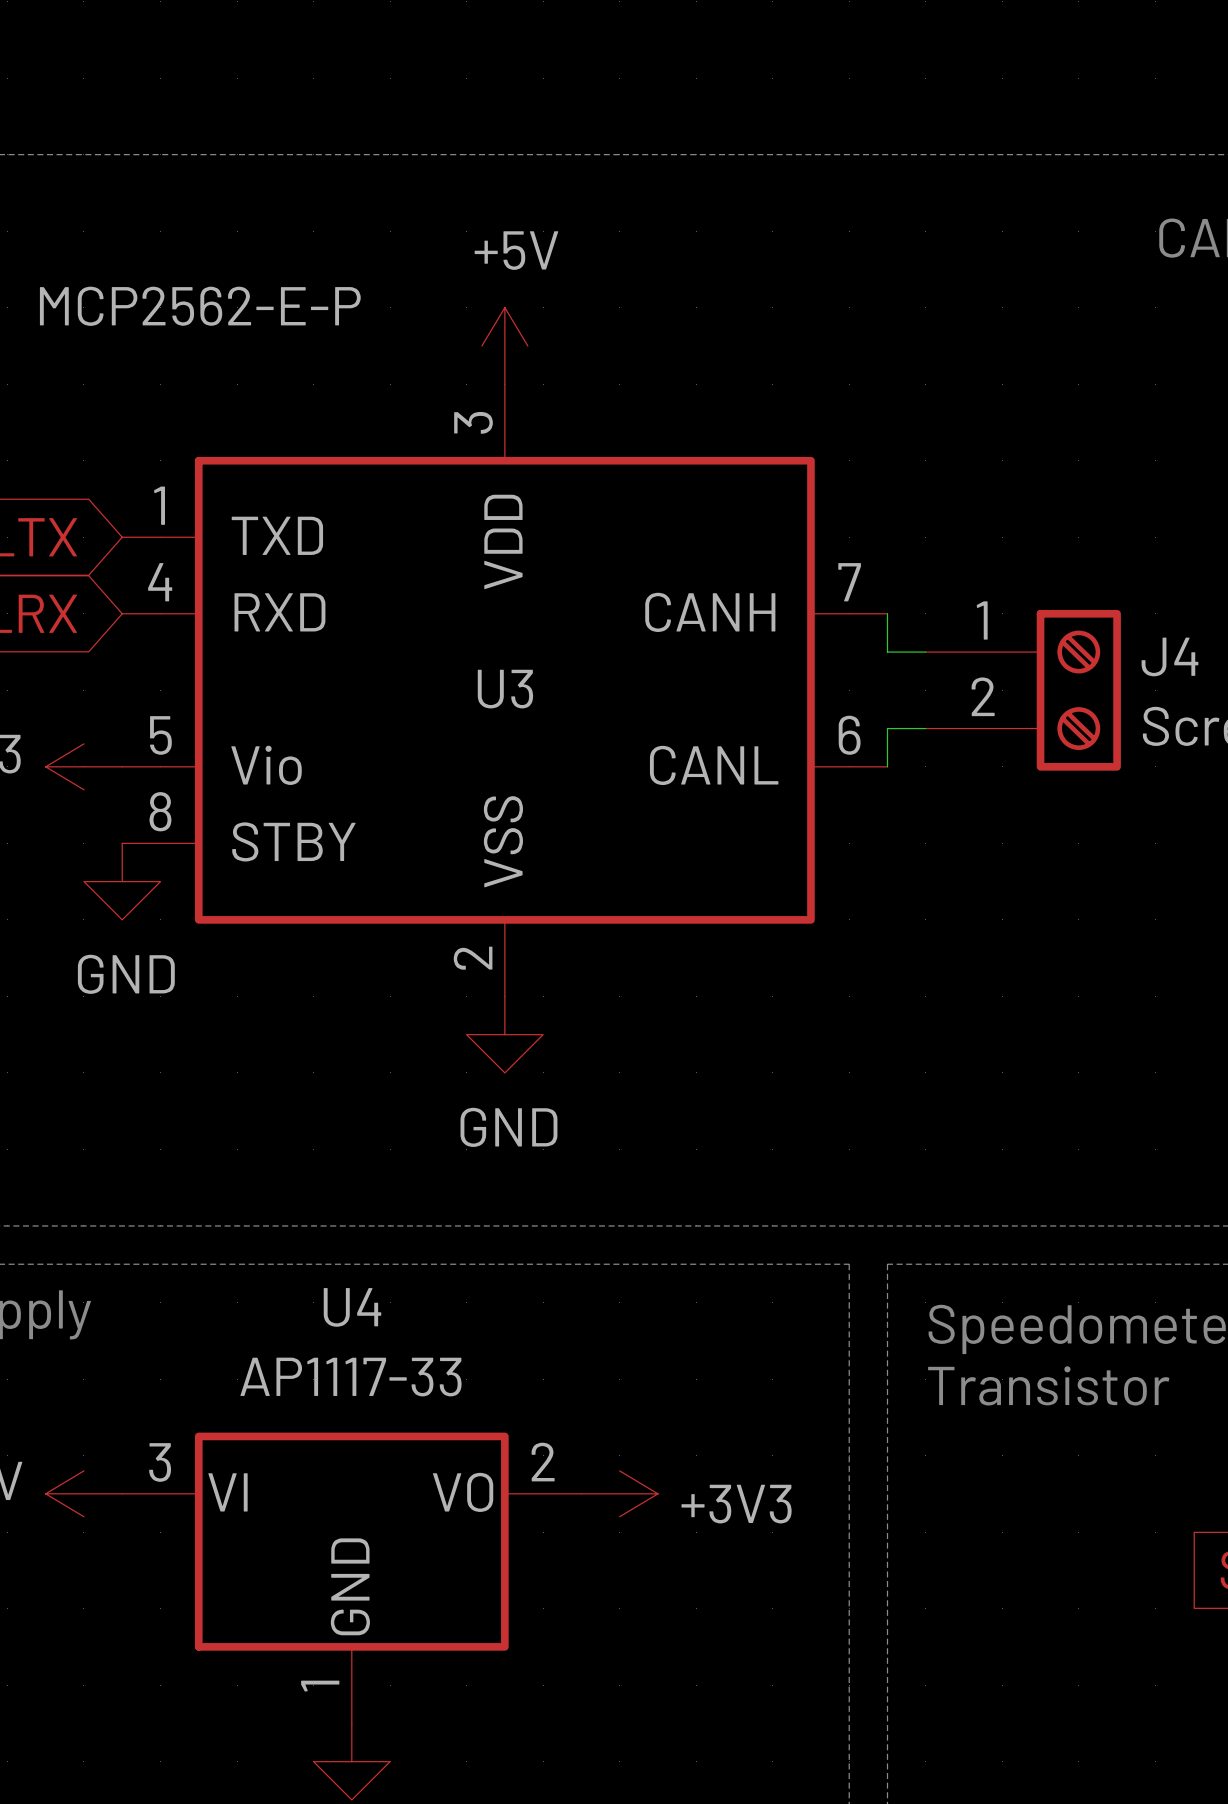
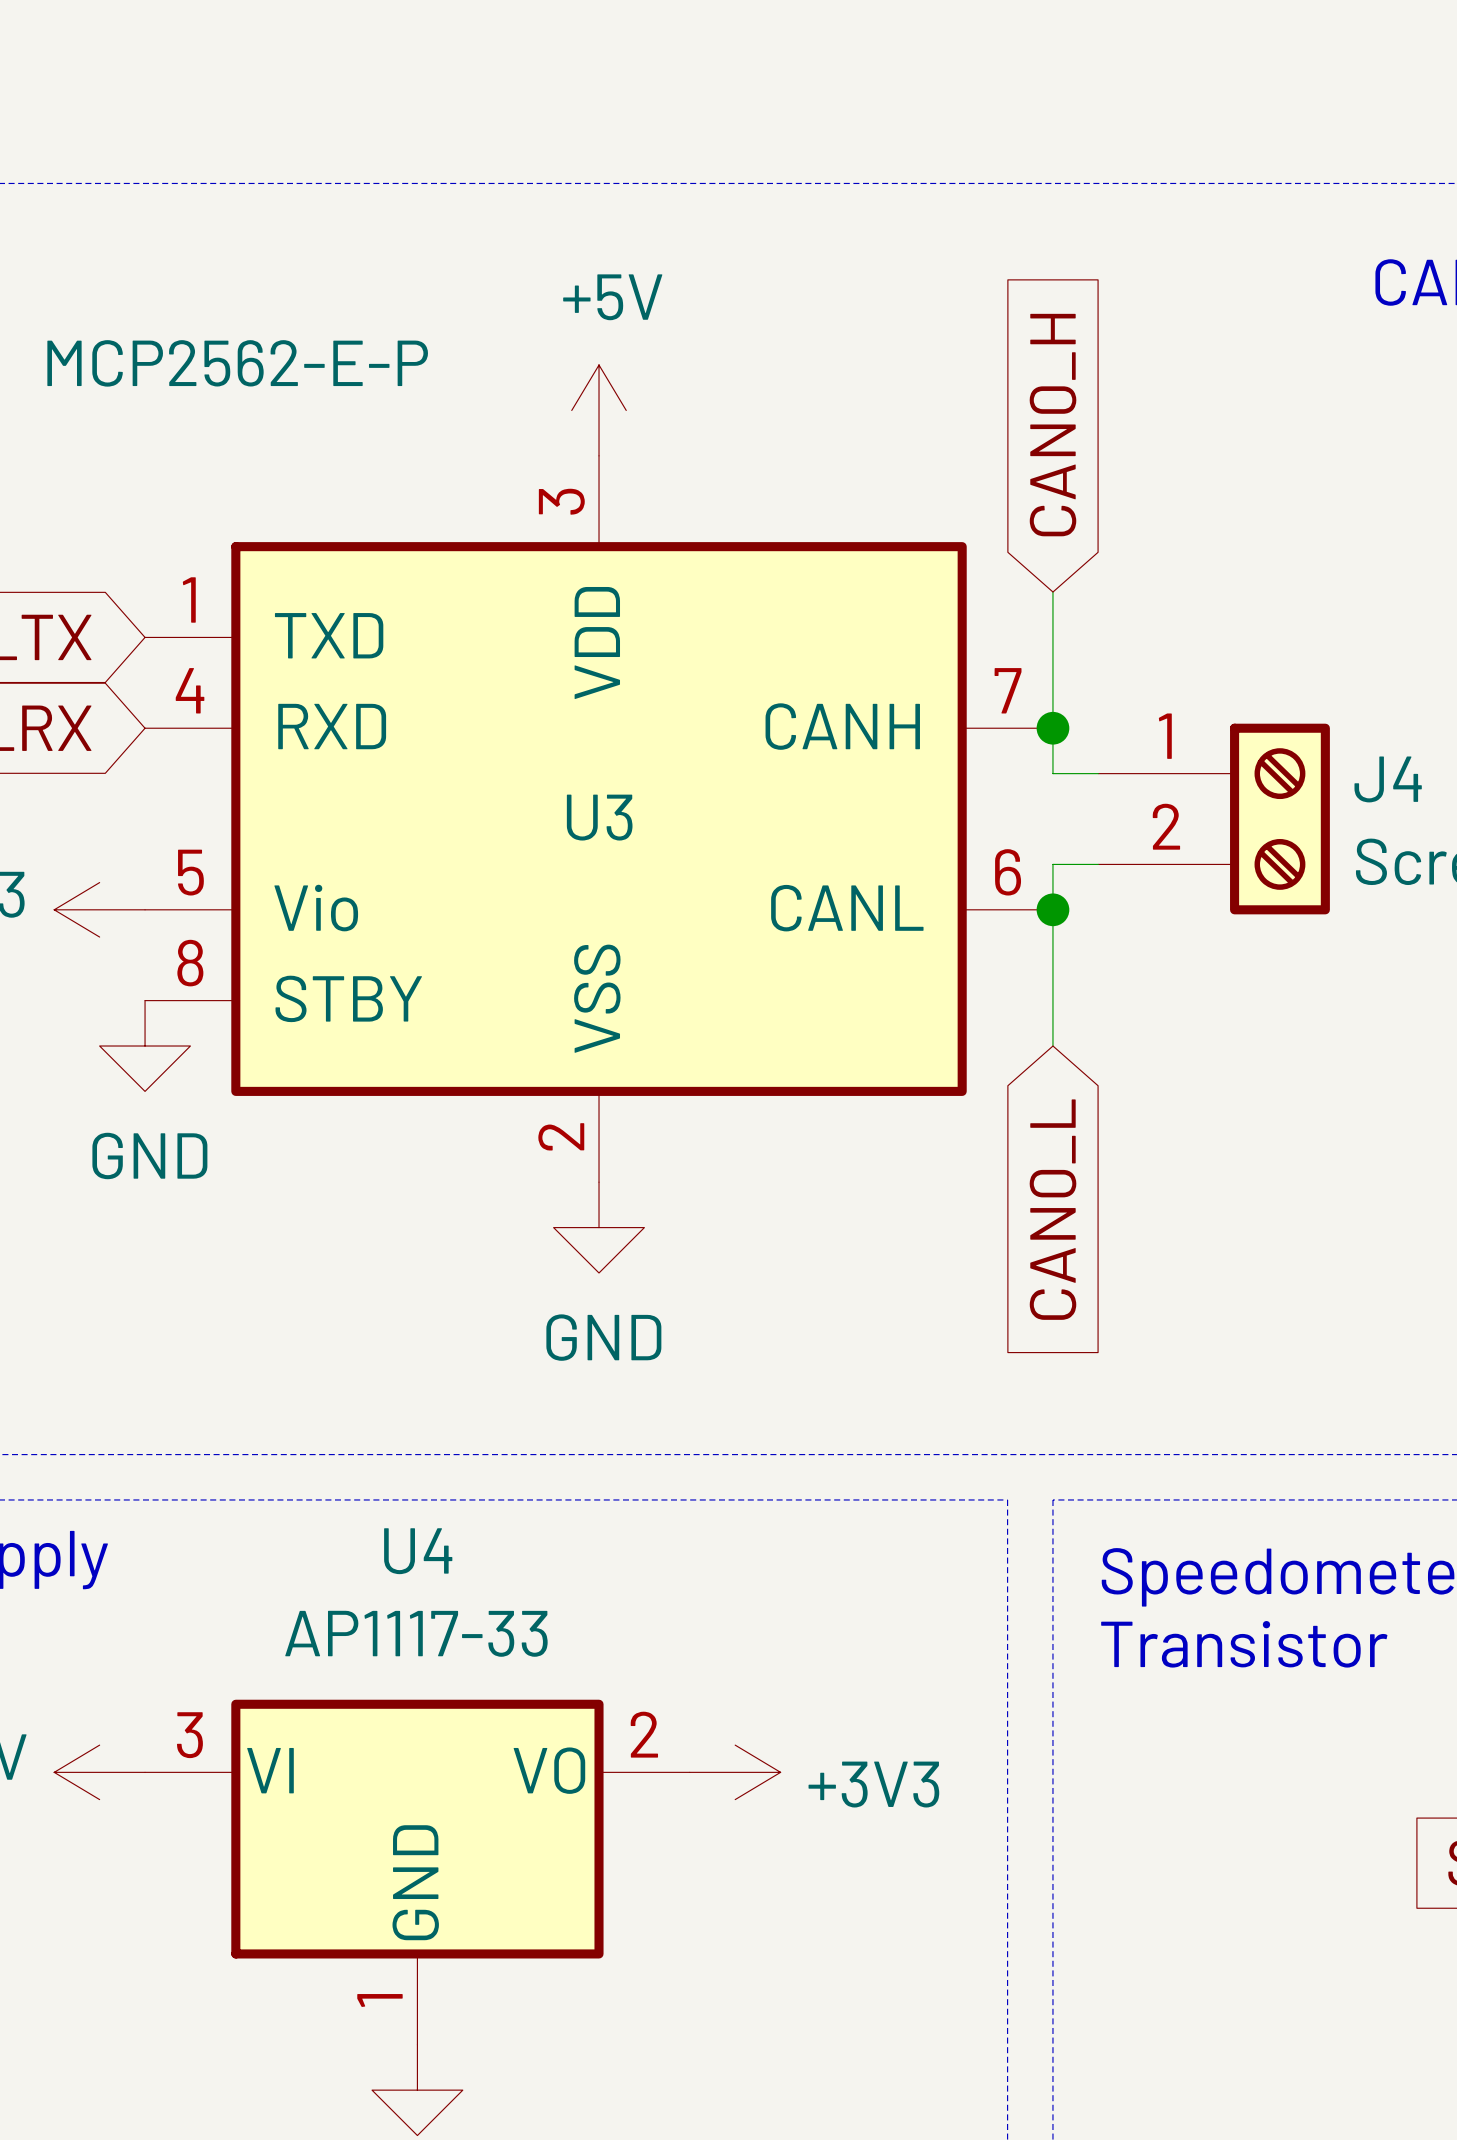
global label: none -> CAN0_H (1053, 425)
wire: none -> (1052, 592) (1052, 728)
junction: none -> (1052, 728)
wire: none -> (1052, 909) (1052, 1046)
junction: none -> (1052, 909)
global label: none -> CAN0_L (1053, 1209)

